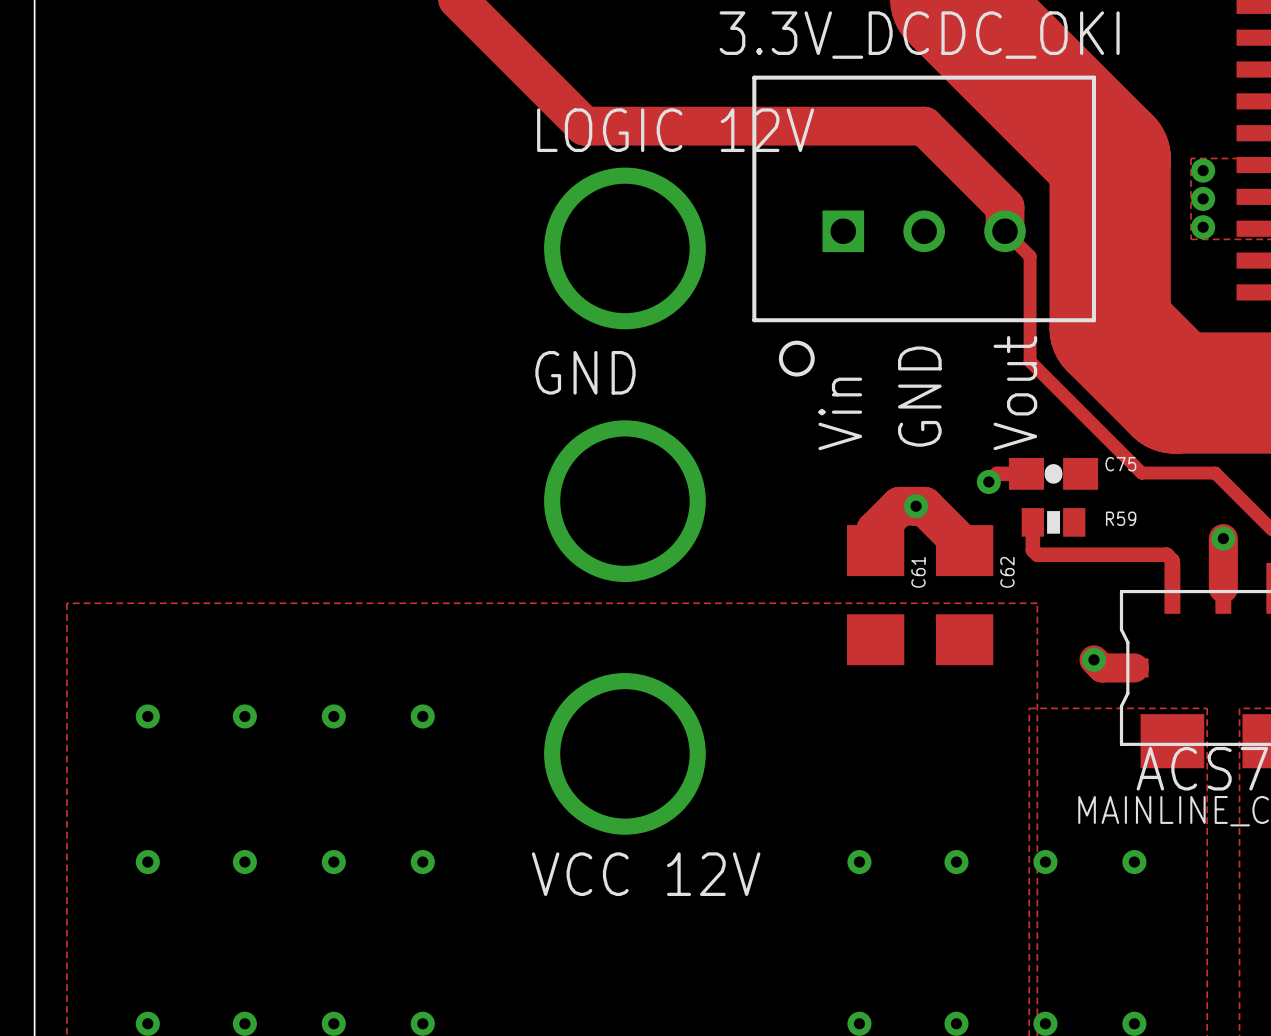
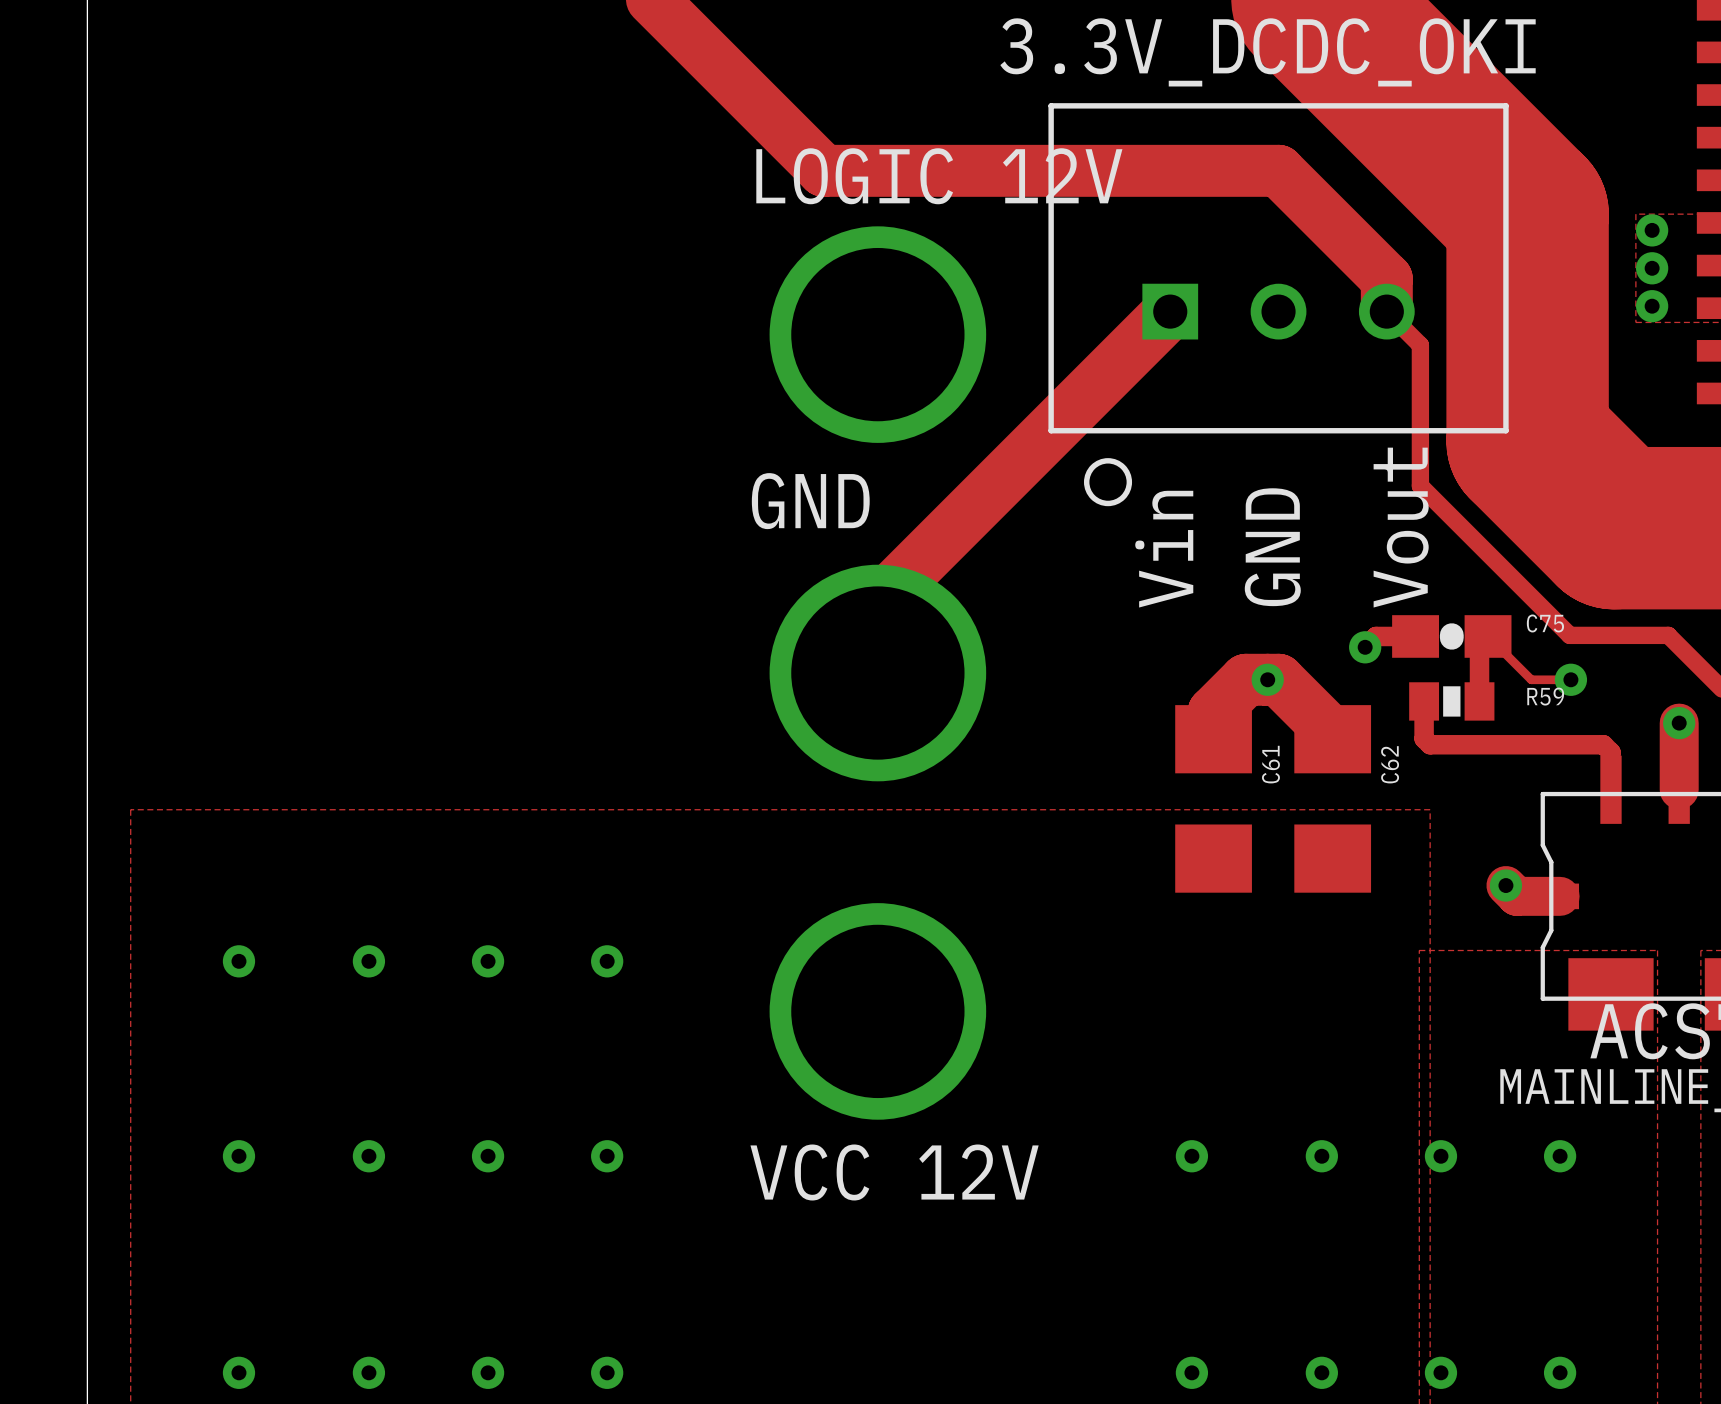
track: none -> (1170, 311) (877, 603) (877, 673)
track: none -> (1570, 679) (1531, 679) (1488, 636) (1479, 645) (1479, 701)
via: none -> (1570, 679)

